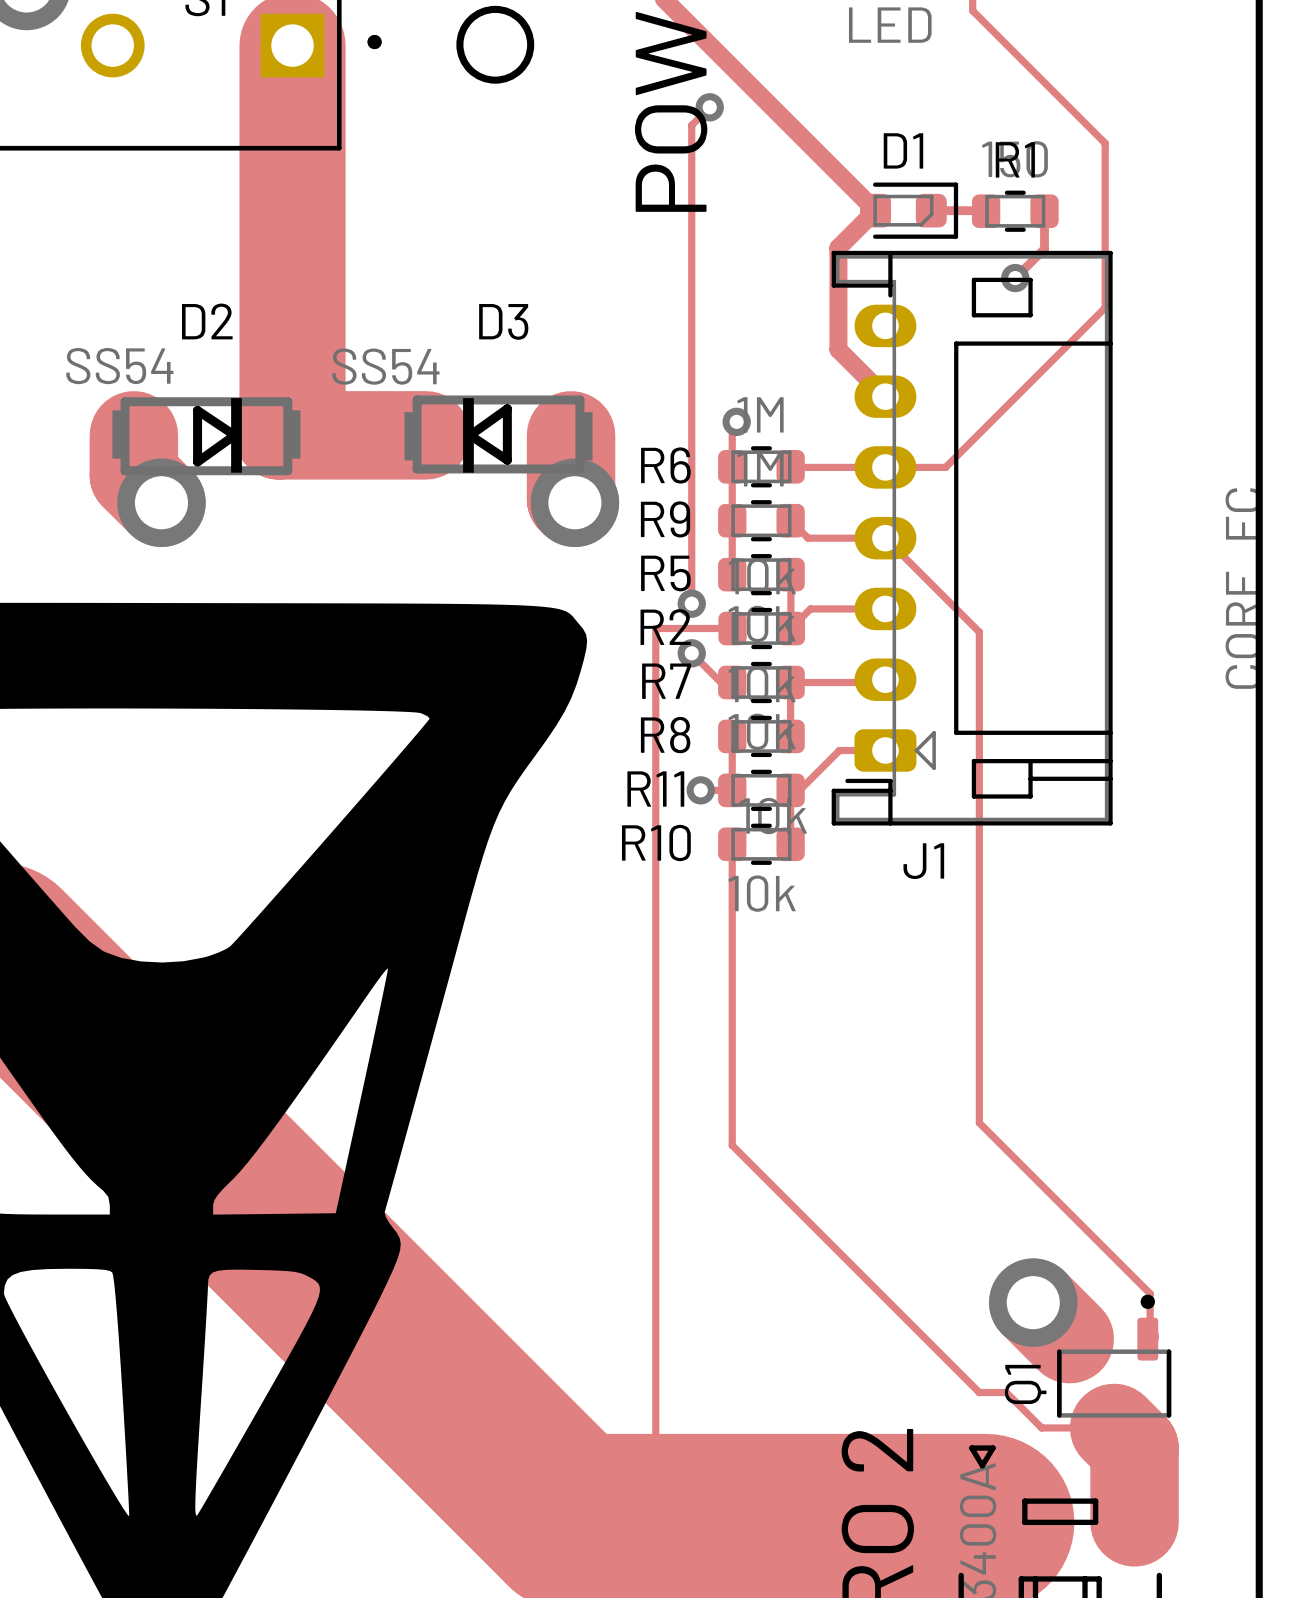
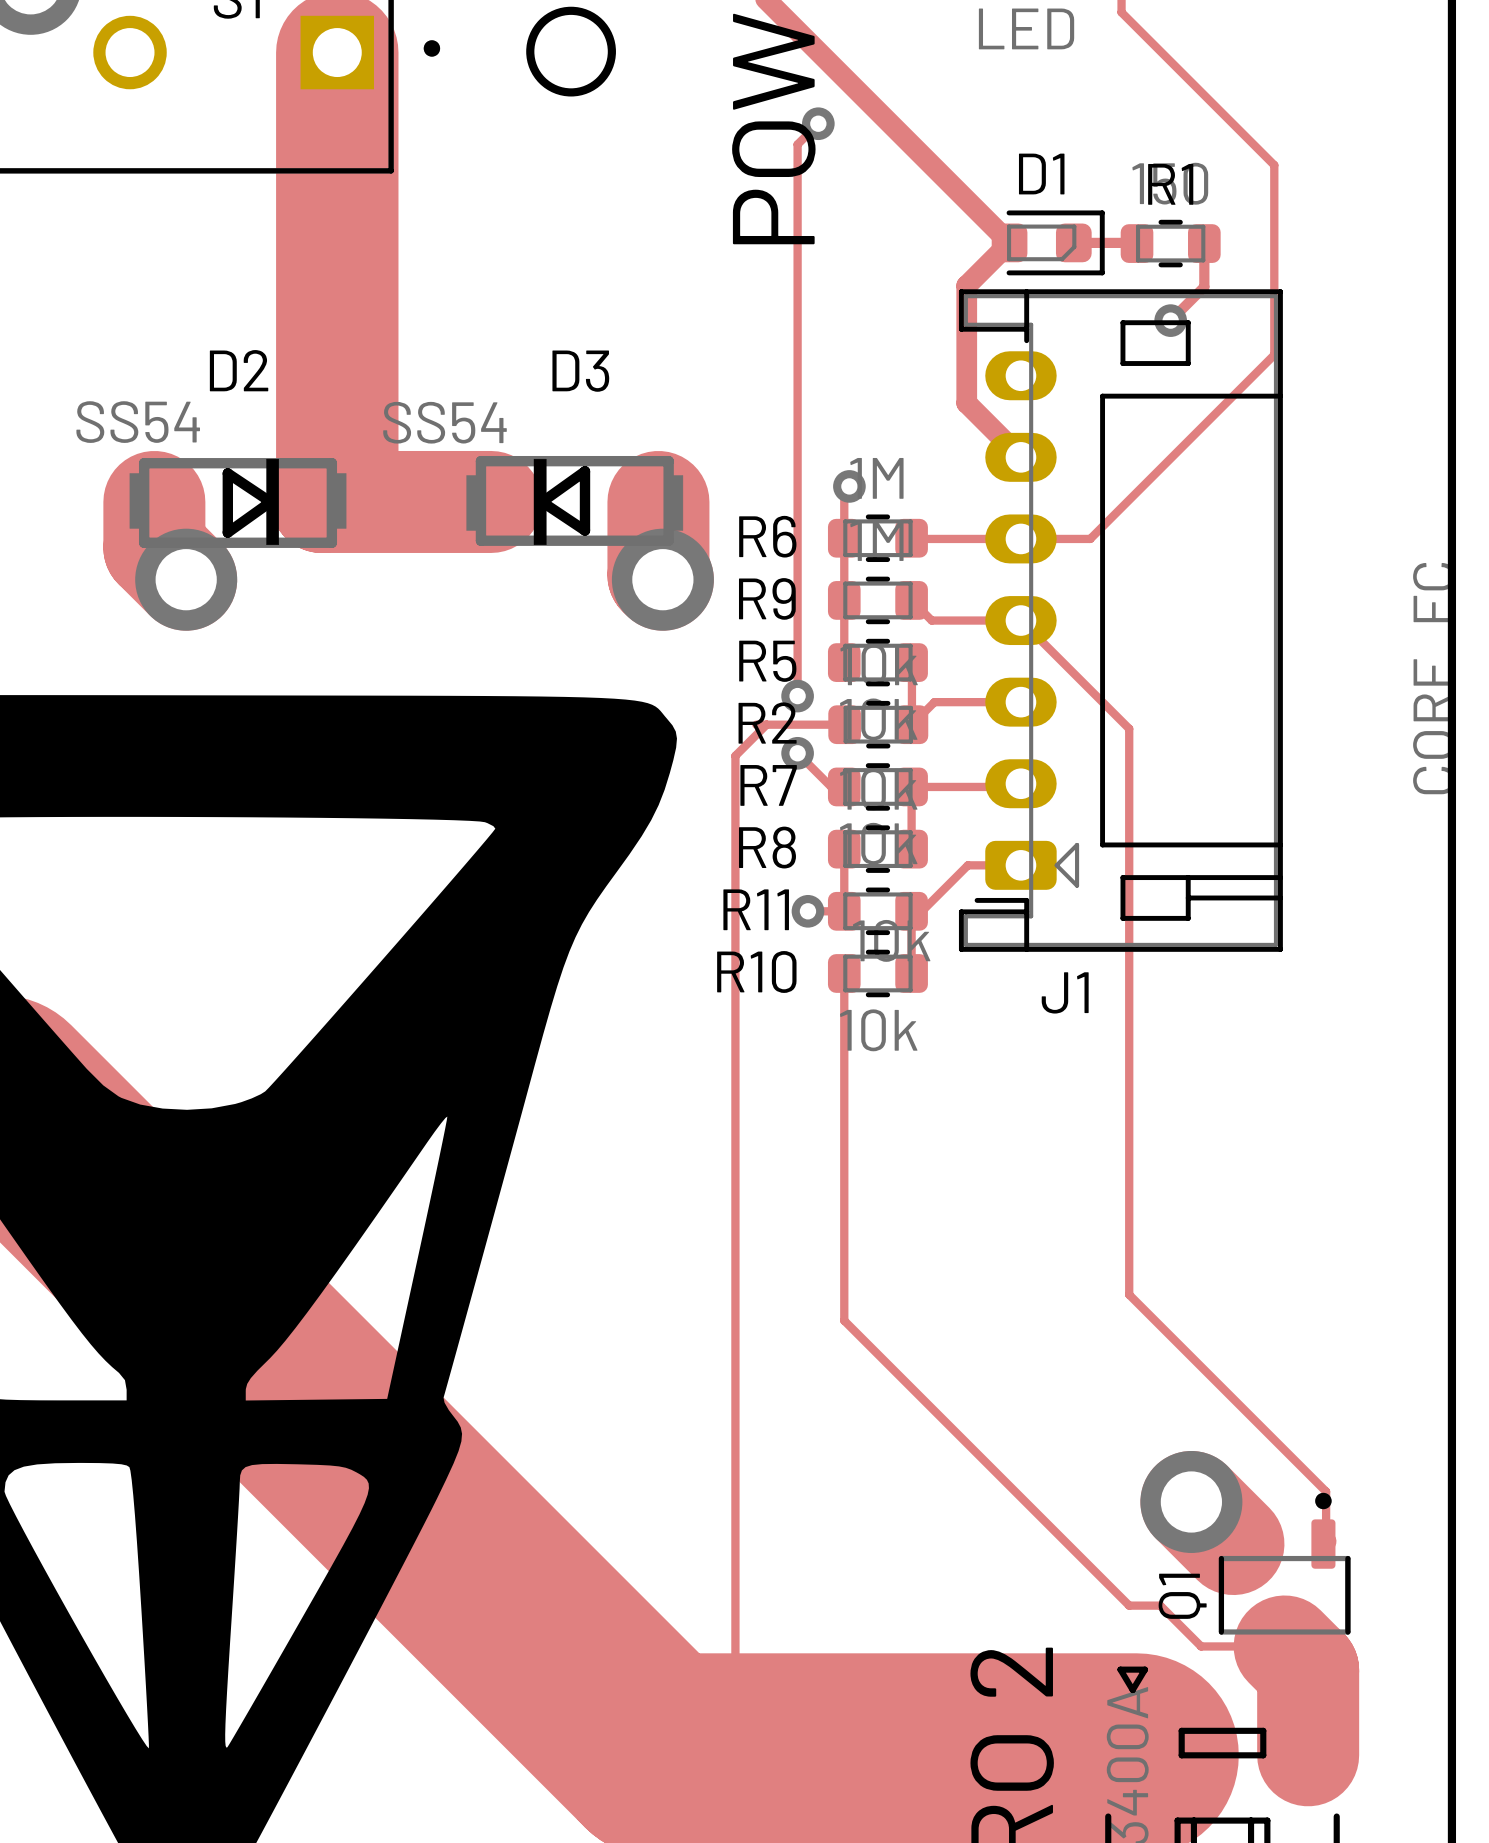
track: (655, 628) (655, 1436) (637, 1454) -> (766, 724) (735, 755) (735, 1677)

